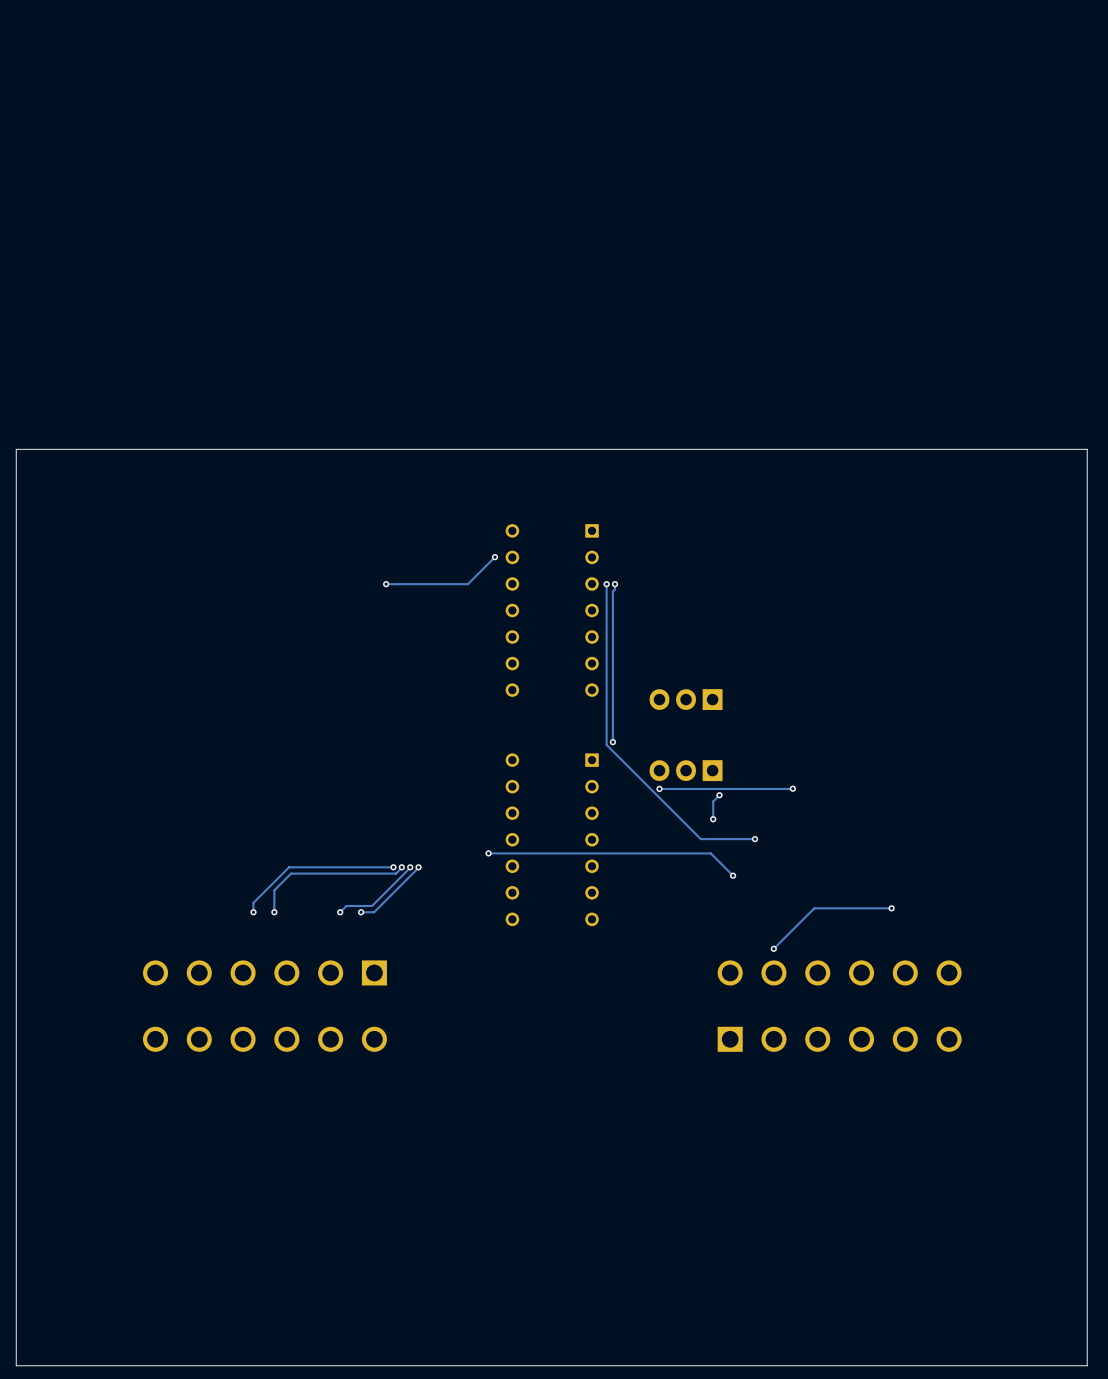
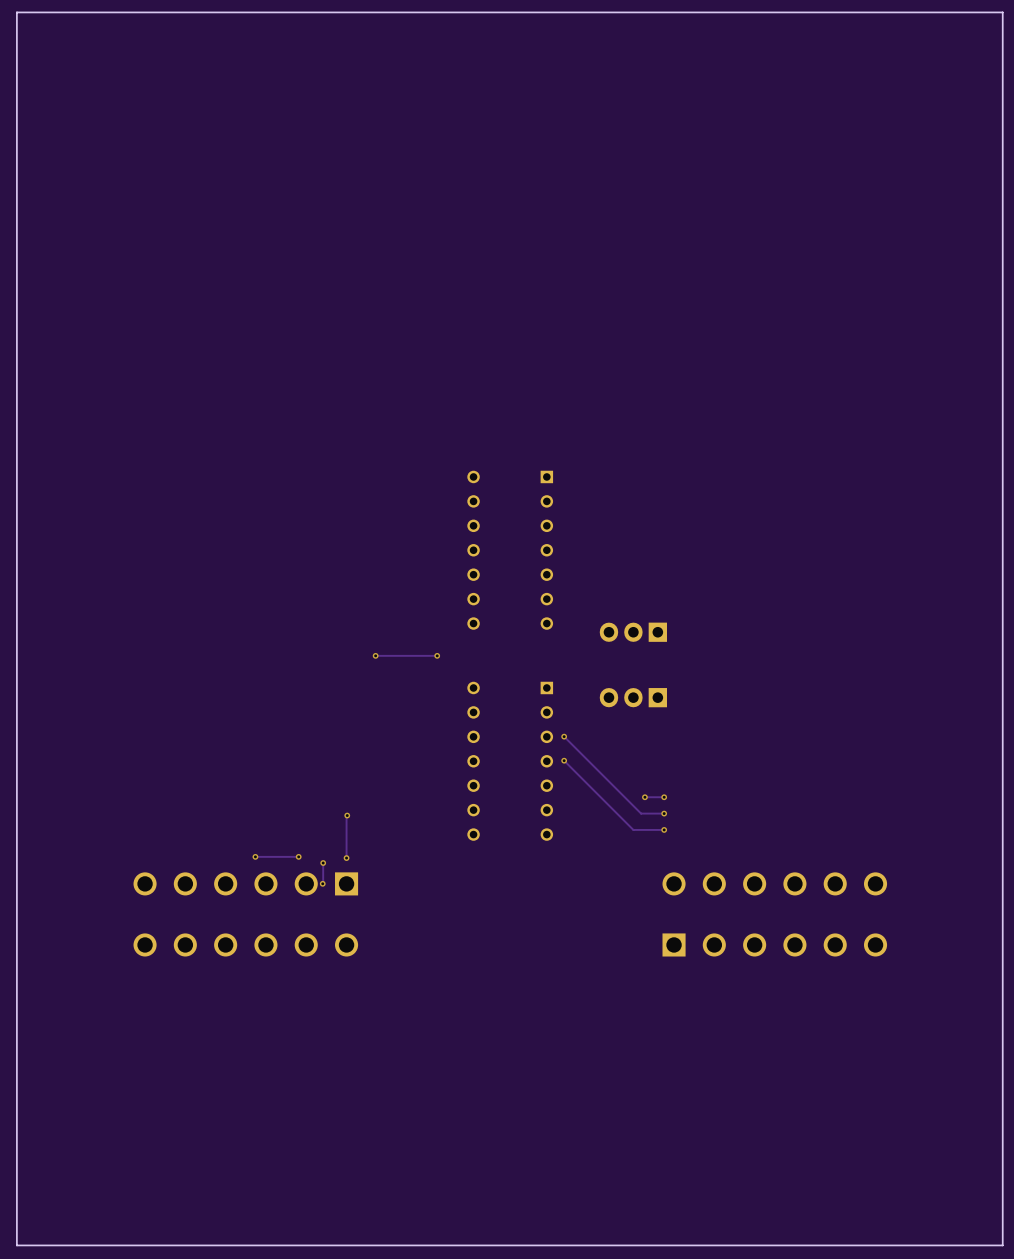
board edge: (1087, 449) (16, 449) -> (1002, 401) (1002, 12) (16, 12) (16, 401)
track: (494, 557) (467, 584) (386, 584) -> none
via: (494, 557) -> none
via: (386, 584) -> none
track: (606, 584) (606, 744) (700, 839) (755, 839) -> none
via: (606, 584) -> none
track: (615, 584) (612, 591) (612, 742) -> none
via: (615, 584) -> none
via: none -> (375, 655)
track: none -> (437, 655) (375, 655)
via: none -> (437, 655)
via: (612, 742) -> none
via: (659, 788) -> none
track: (792, 788) (659, 788) -> none
via: (792, 788) -> none
track: (719, 795) (713, 801) (713, 819) -> none
via: (719, 795) -> none
track: none -> (564, 736) (641, 813) (664, 813)
via: none -> (564, 736)
via: (713, 819) -> none
track: none -> (564, 760) (633, 829) (664, 829)
via: none -> (564, 760)
via: (755, 839) -> none
track: (488, 853) (710, 853) (733, 875) -> none
via: (488, 853) -> none
track: (393, 867) (289, 867) (253, 902) (253, 912) -> none
via: (393, 867) -> none
track: (401, 867) (396, 873) (291, 873) (274, 890) (274, 912) -> none
via: (401, 867) -> none
track: (410, 867) (372, 905) (346, 905) (340, 912) -> none
via: (410, 867) -> none
track: (418, 867) (374, 912) (361, 912) -> none
via: (418, 867) -> none
via: (733, 875) -> none
via: none -> (644, 797)
track: none -> (664, 797) (644, 797)
via: none -> (664, 797)
via: none -> (664, 813)
track: none -> (347, 815) (346, 858)
via: none -> (347, 815)
track: (891, 908) (814, 908) (773, 948) -> none
via: (891, 908) -> none
via: (253, 912) -> none
via: (274, 912) -> none
via: (340, 912) -> none
via: (361, 912) -> none
via: none -> (664, 829)
via: none -> (255, 856)
track: none -> (298, 856) (255, 856)
via: none -> (298, 856)
via: none -> (346, 858)
via: (773, 948) -> none
track: none -> (323, 863) (322, 883)
via: none -> (323, 863)
via: none -> (322, 883)

